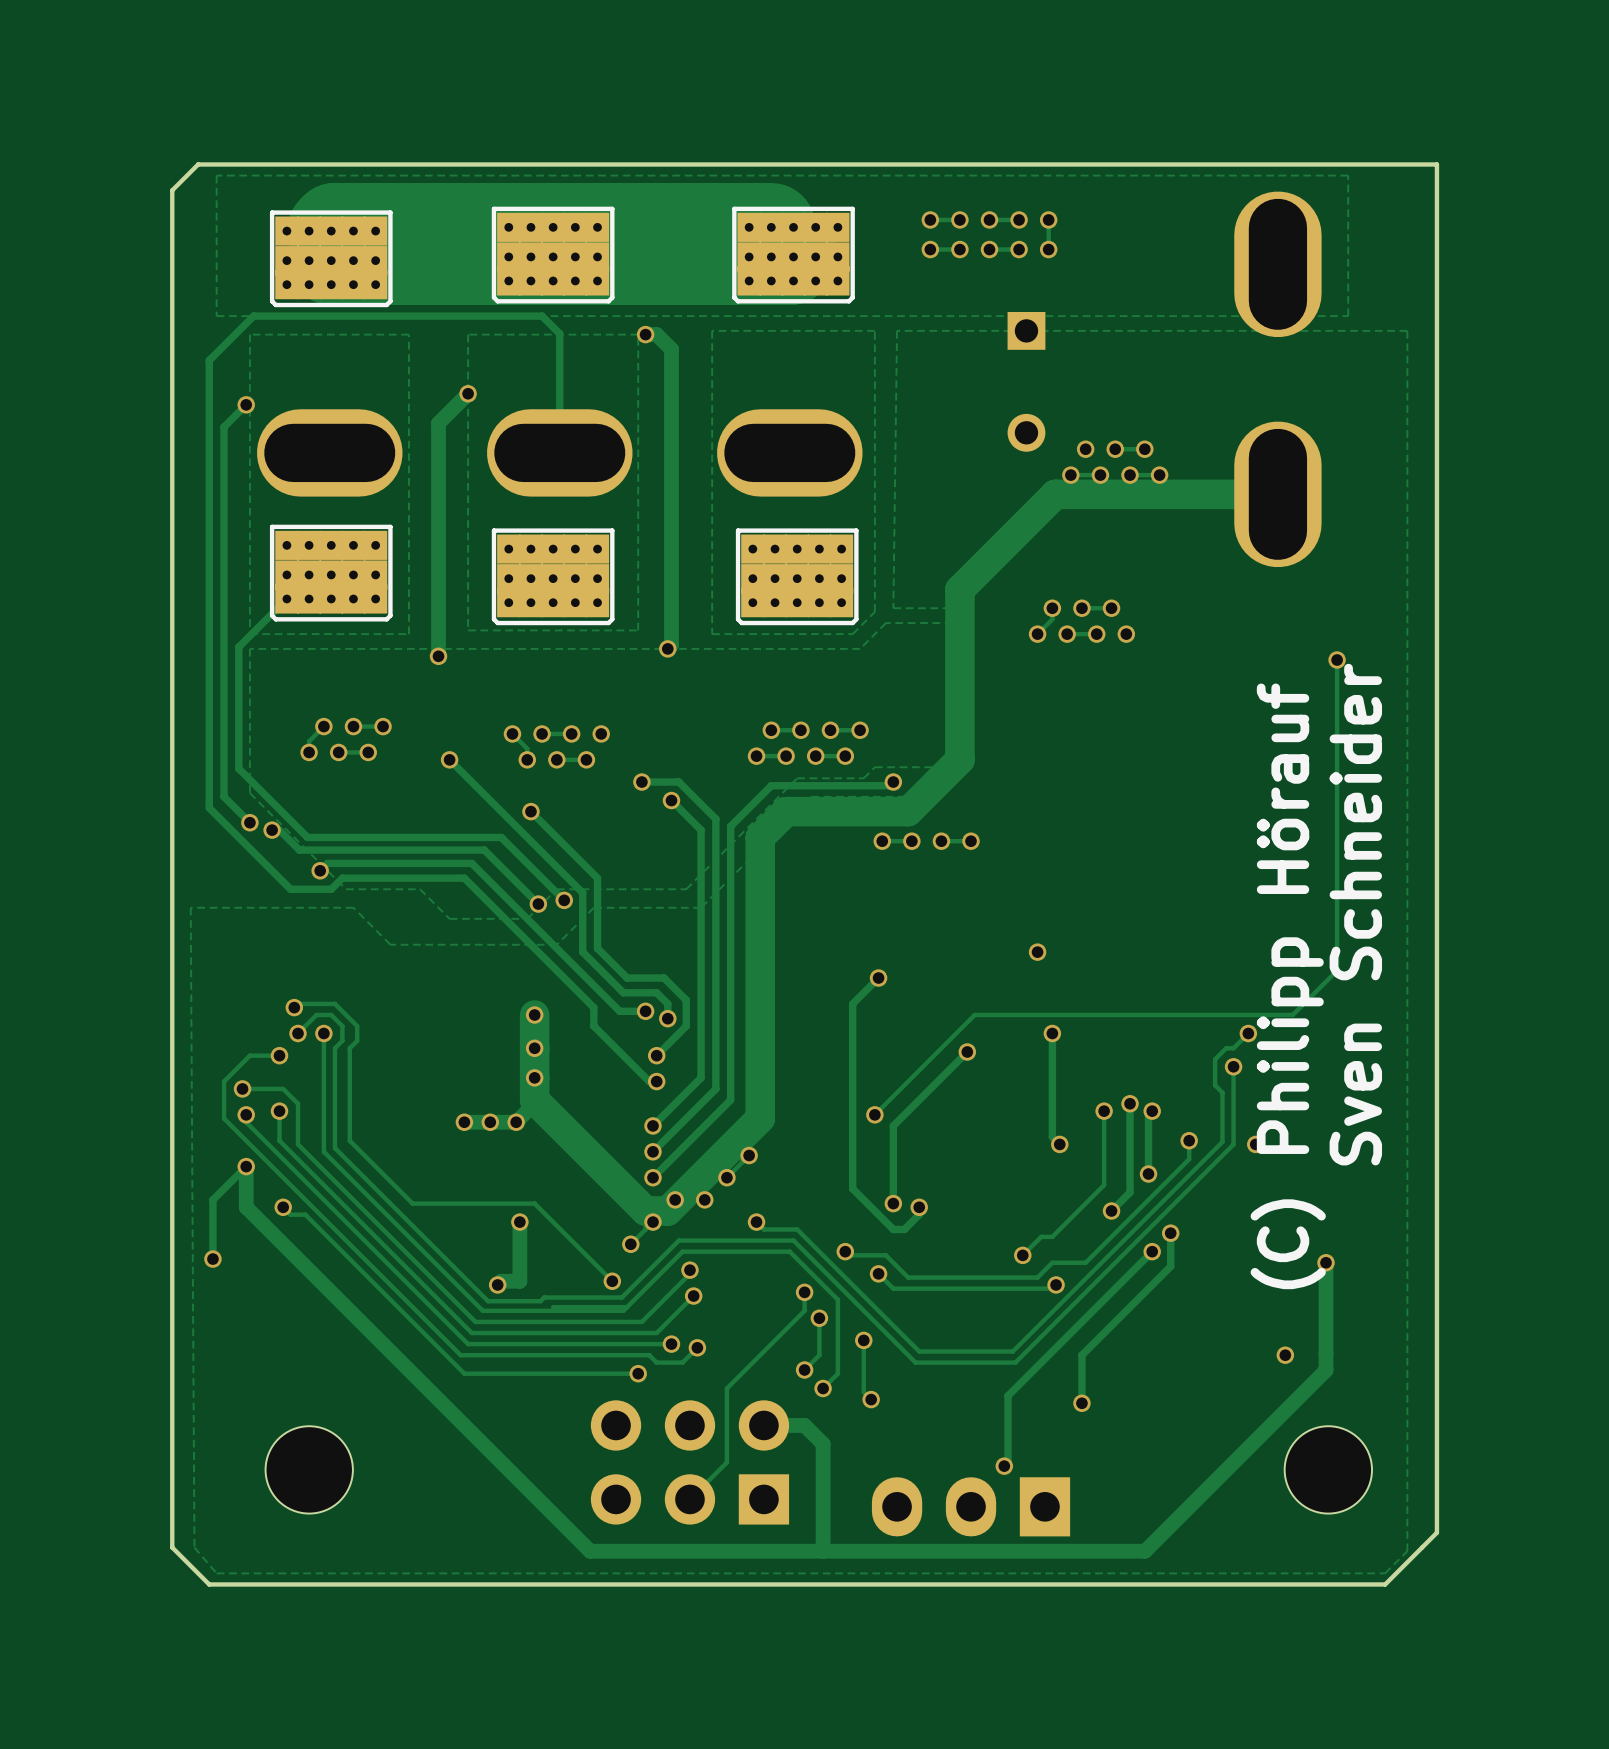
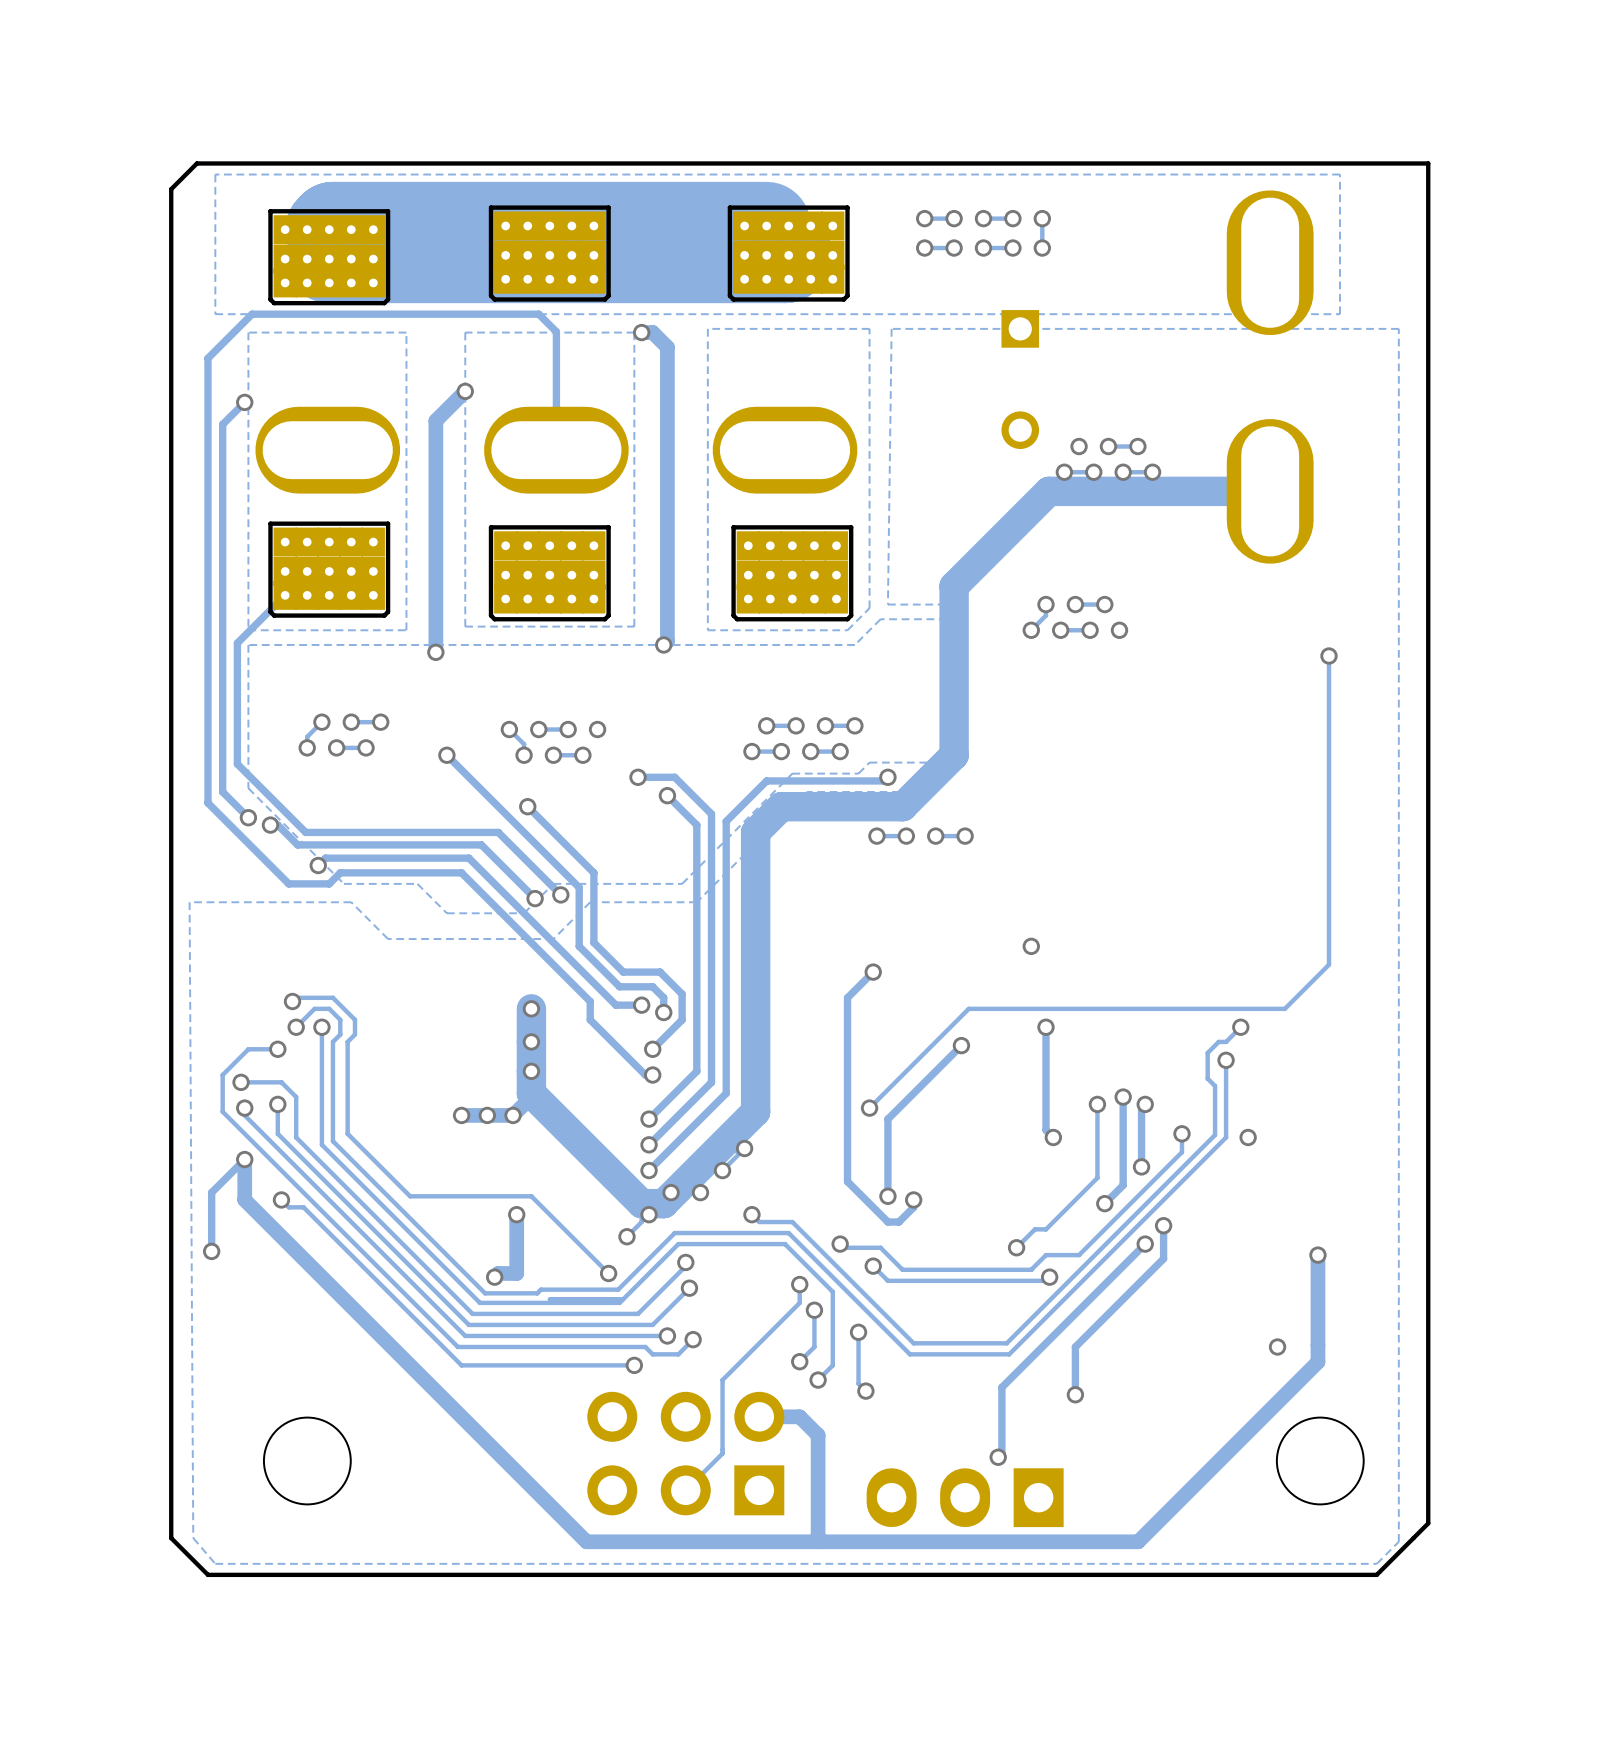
text: Sven Schneider (1355, 914) -> none
text: (C) Philipp Hörauf (1288, 986) -> none

